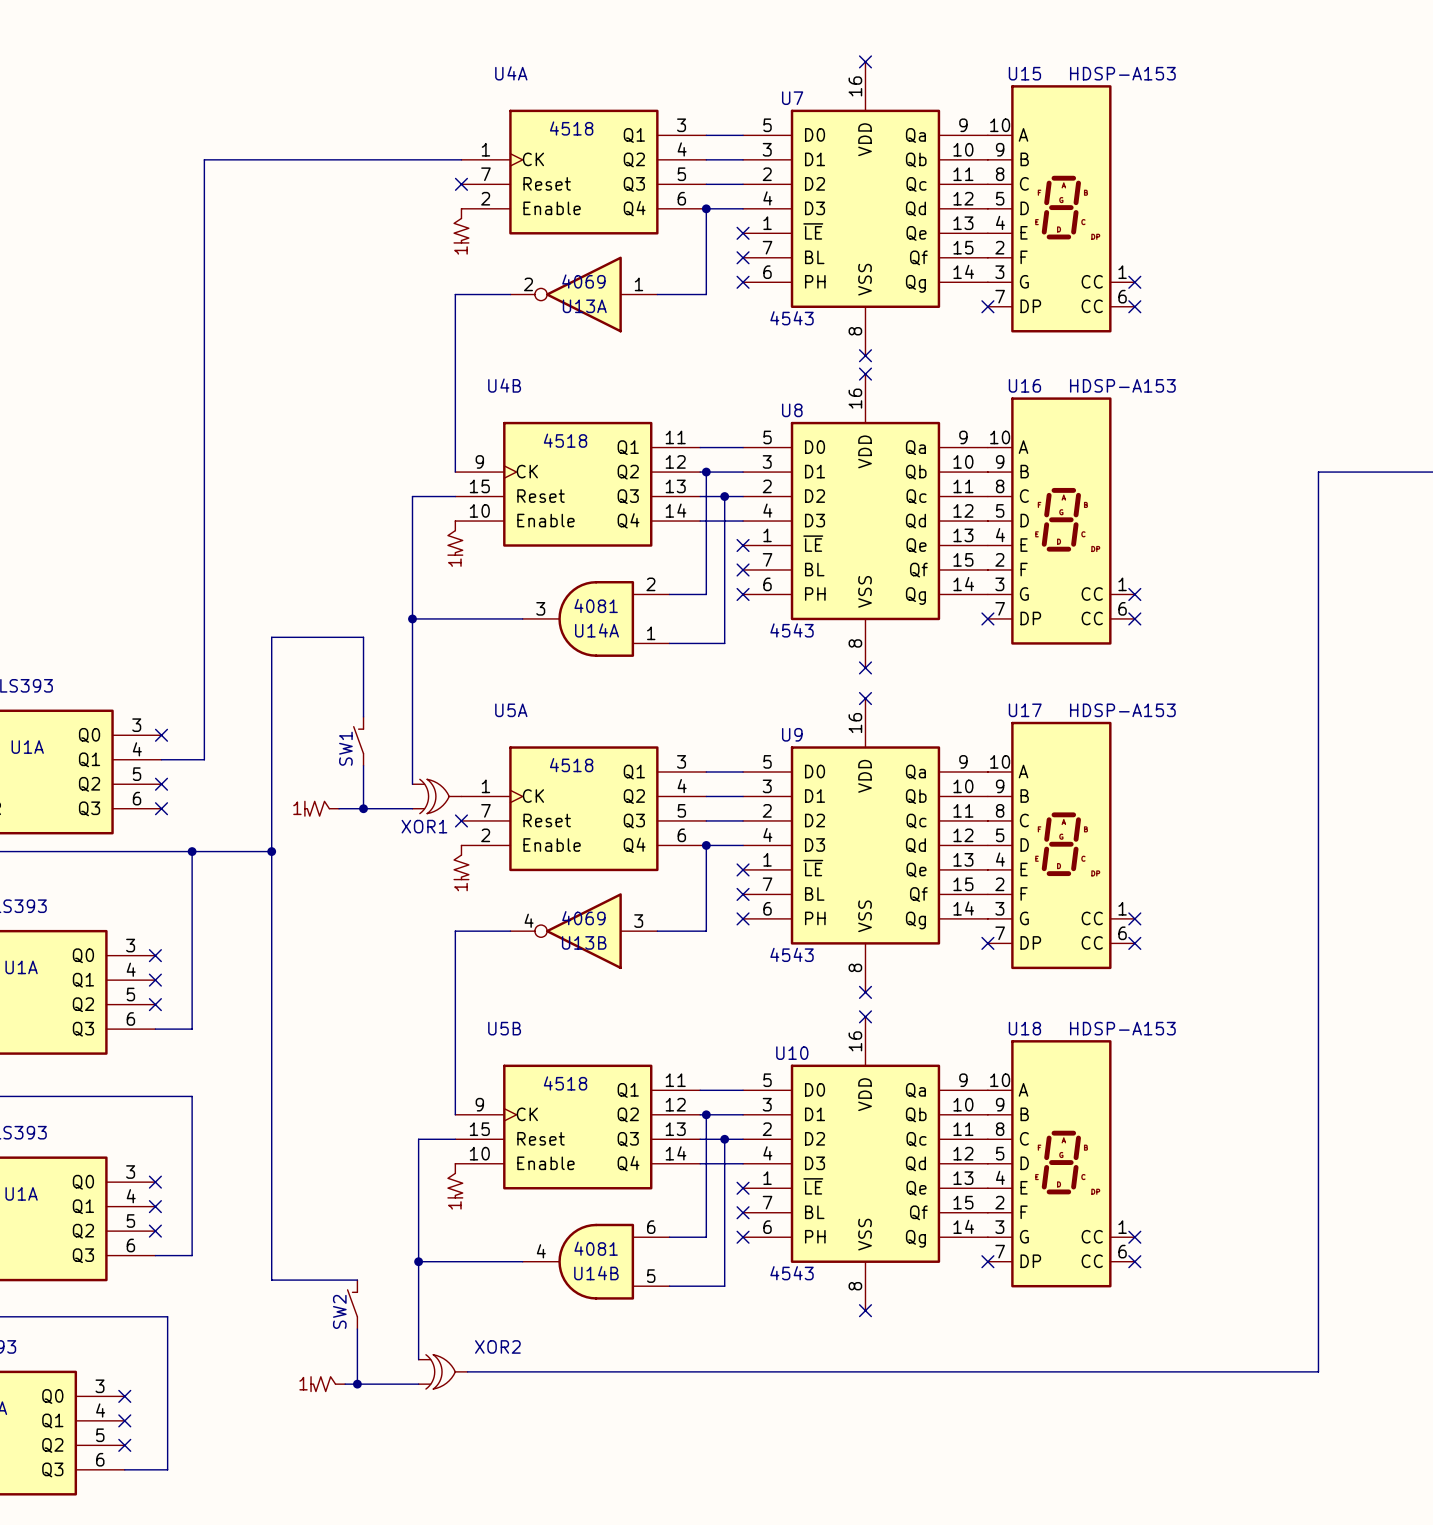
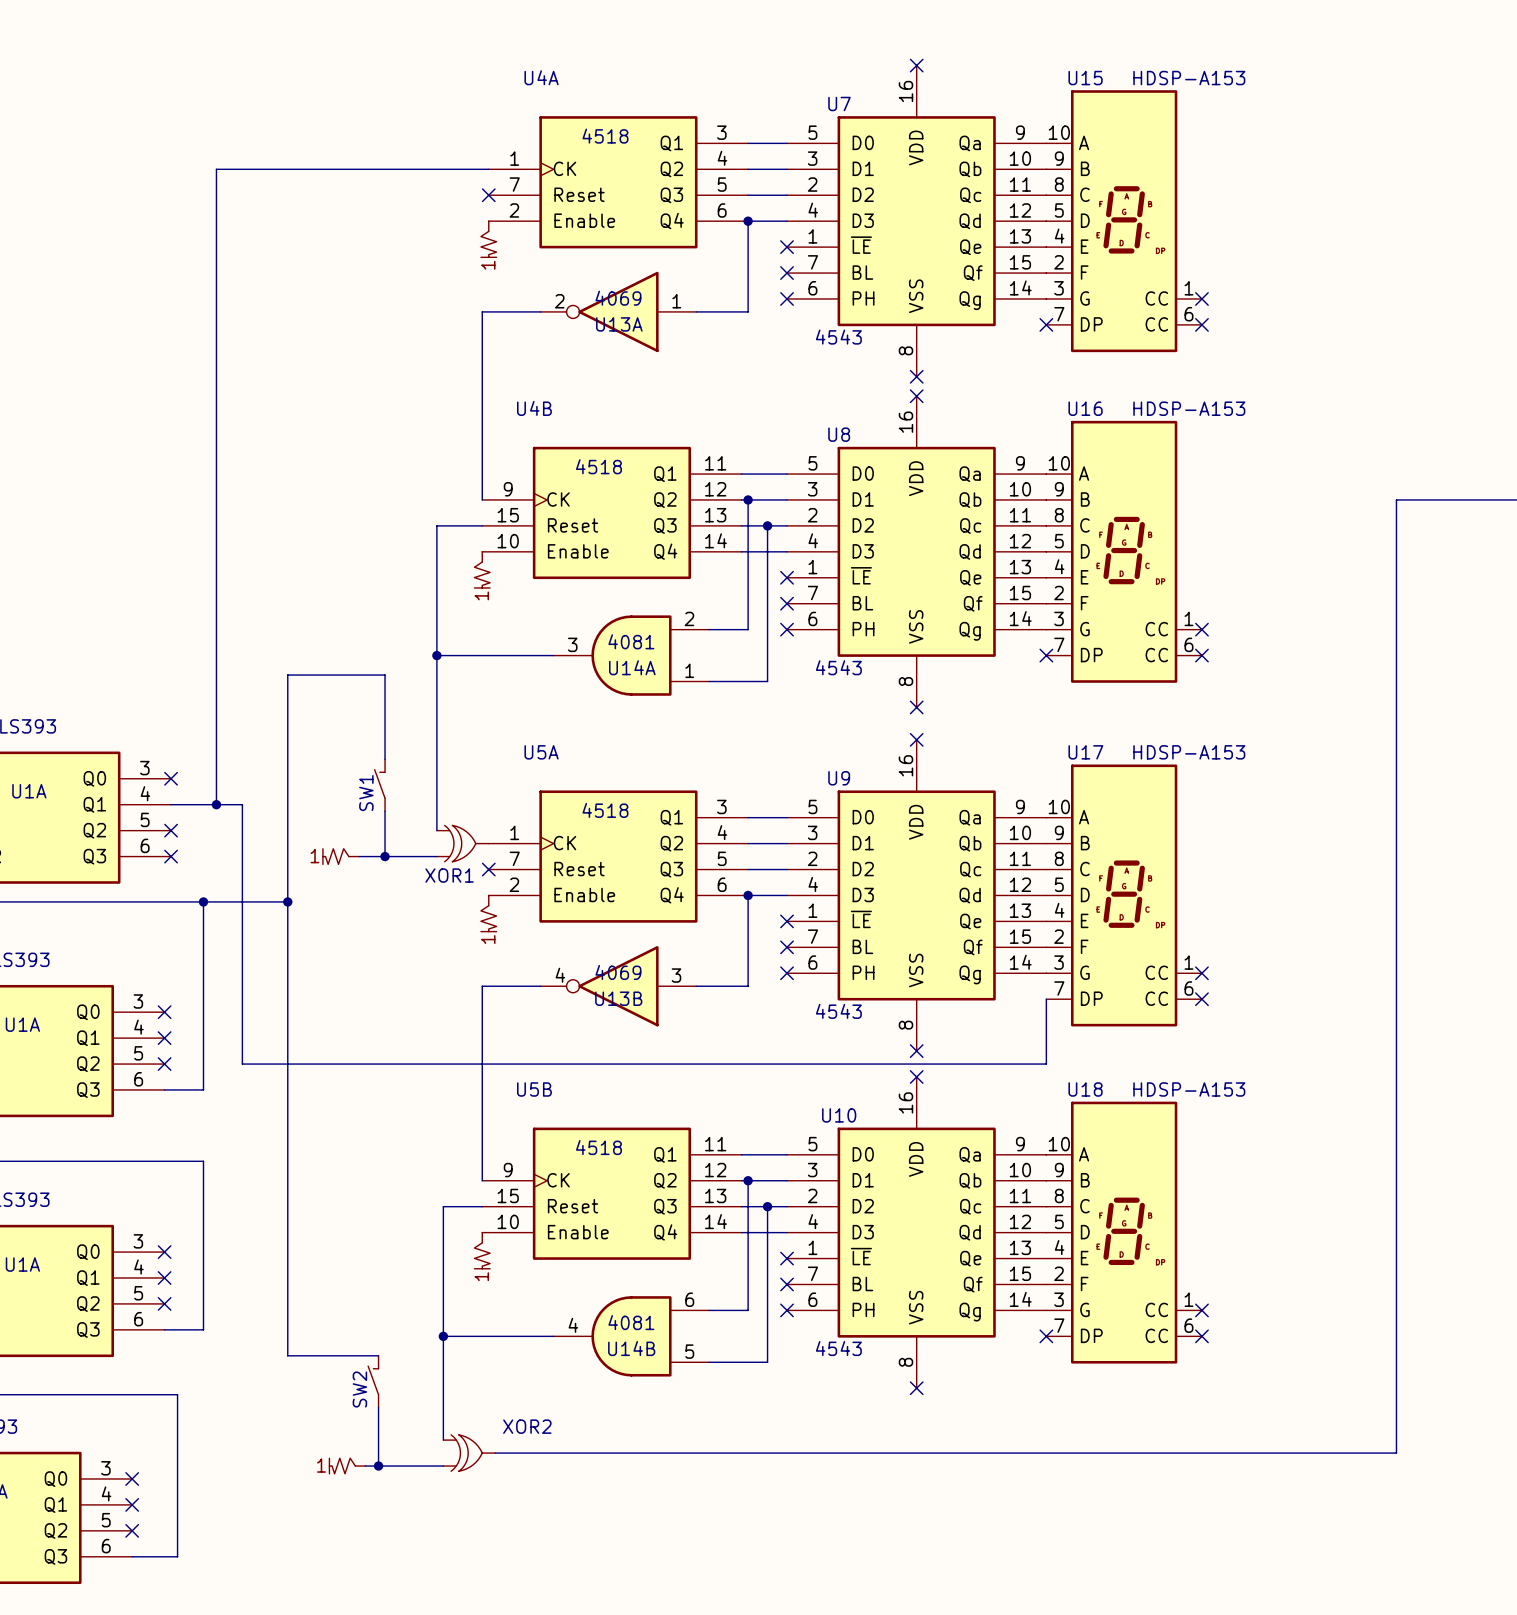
wire: none -> (216, 804) (242, 804) (242, 1064) (1046, 1064) (1046, 999)
junction: none -> (216, 804)
no-connect mark: (987, 943) -> none

